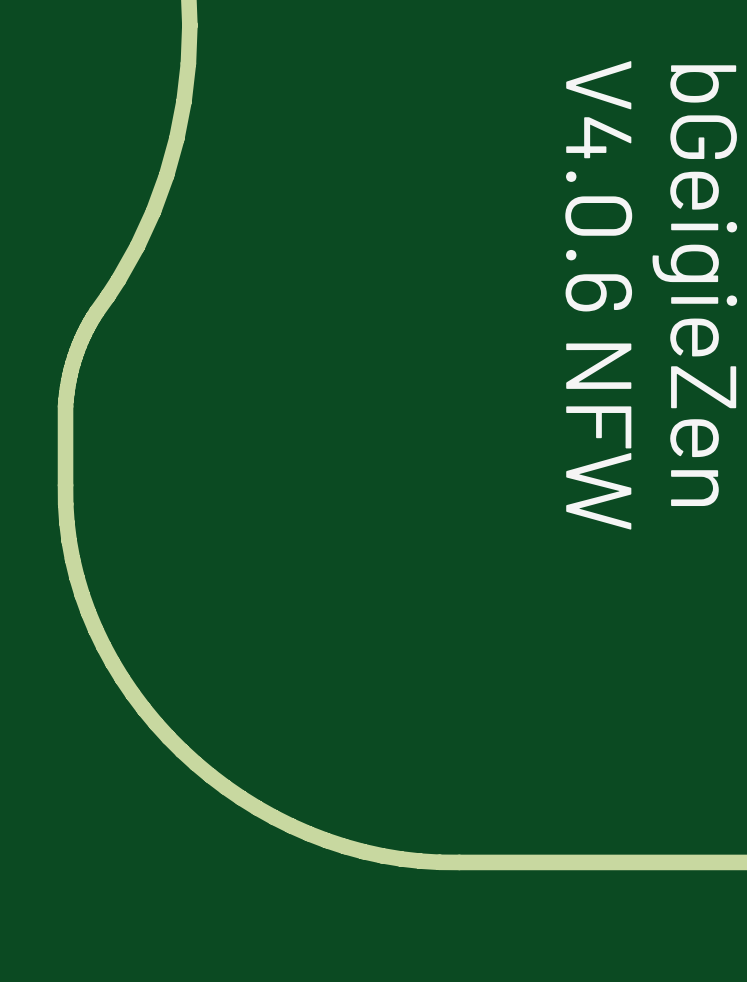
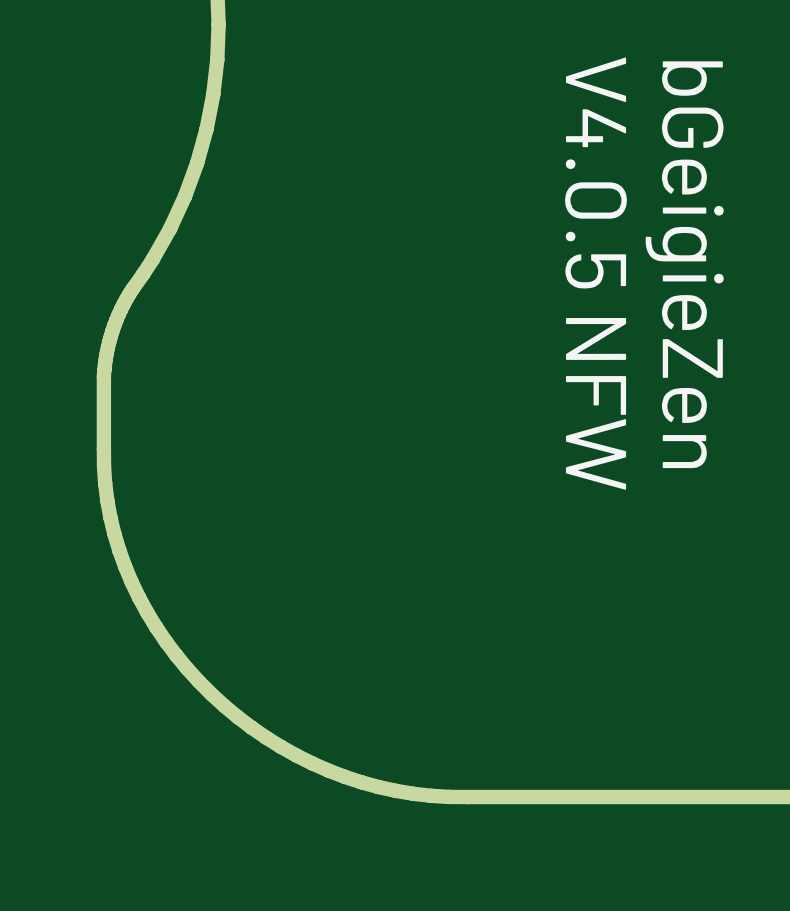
text: V4.0.6 NFW (598, 295) -> V4.0.5 NFW (595, 273)

